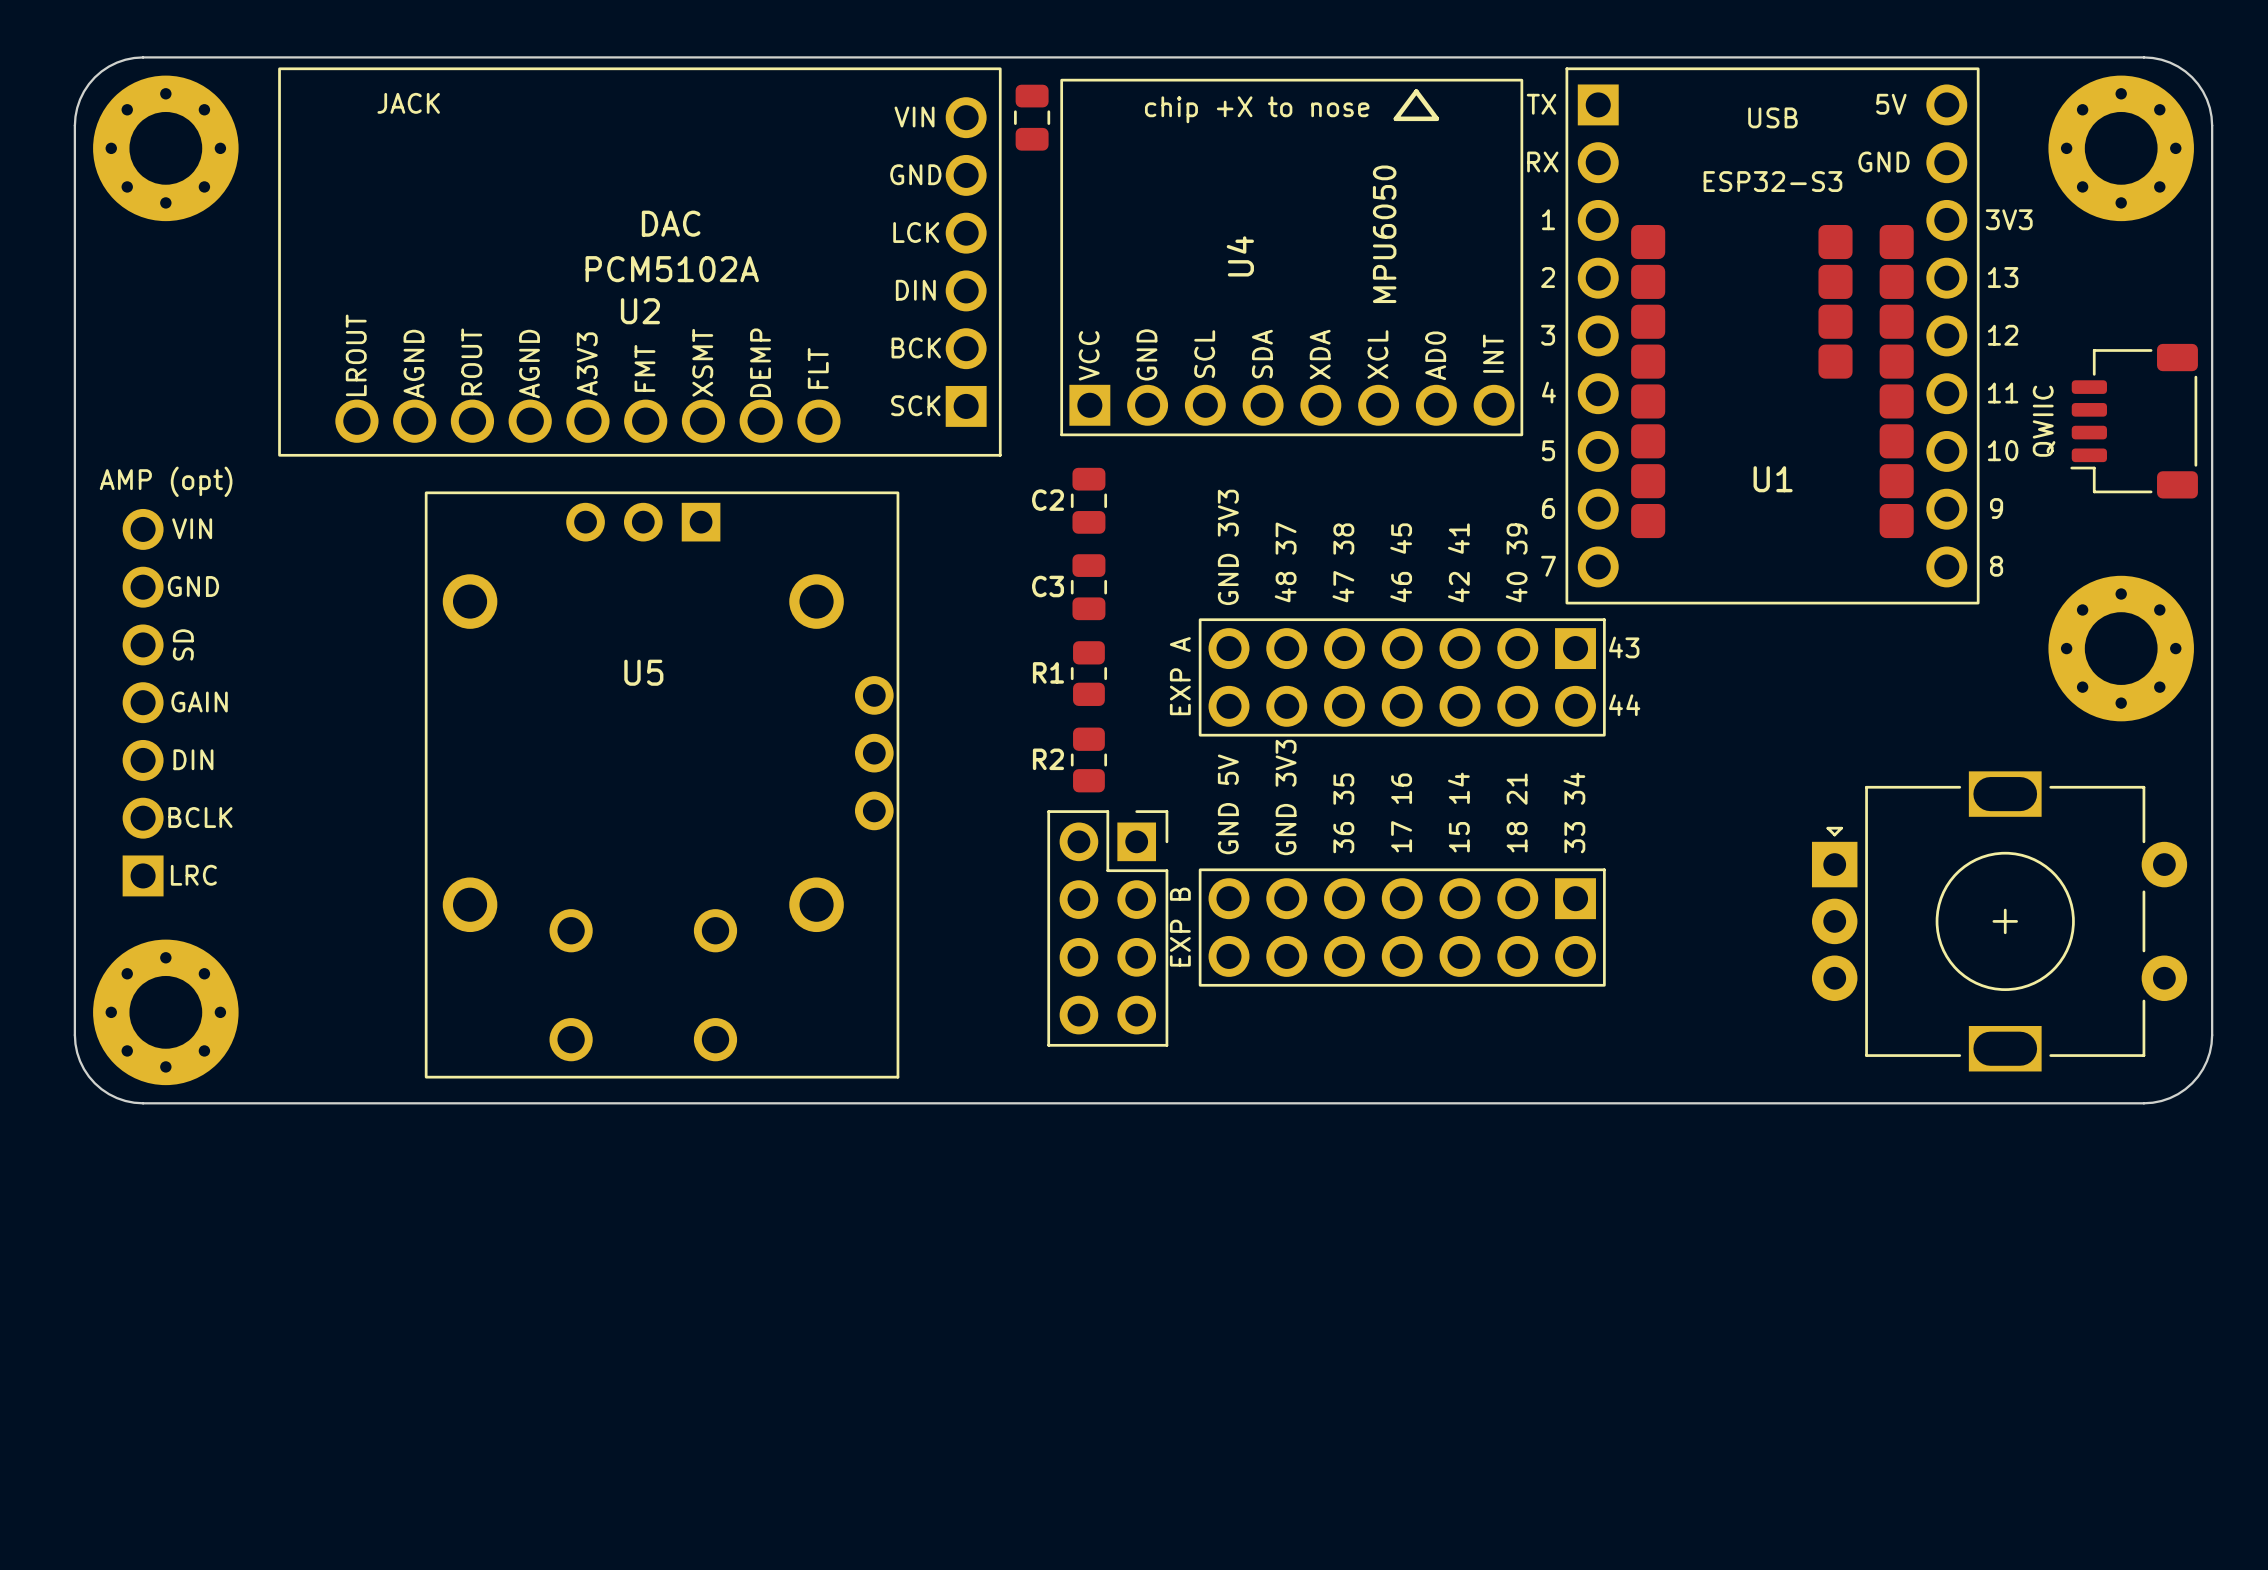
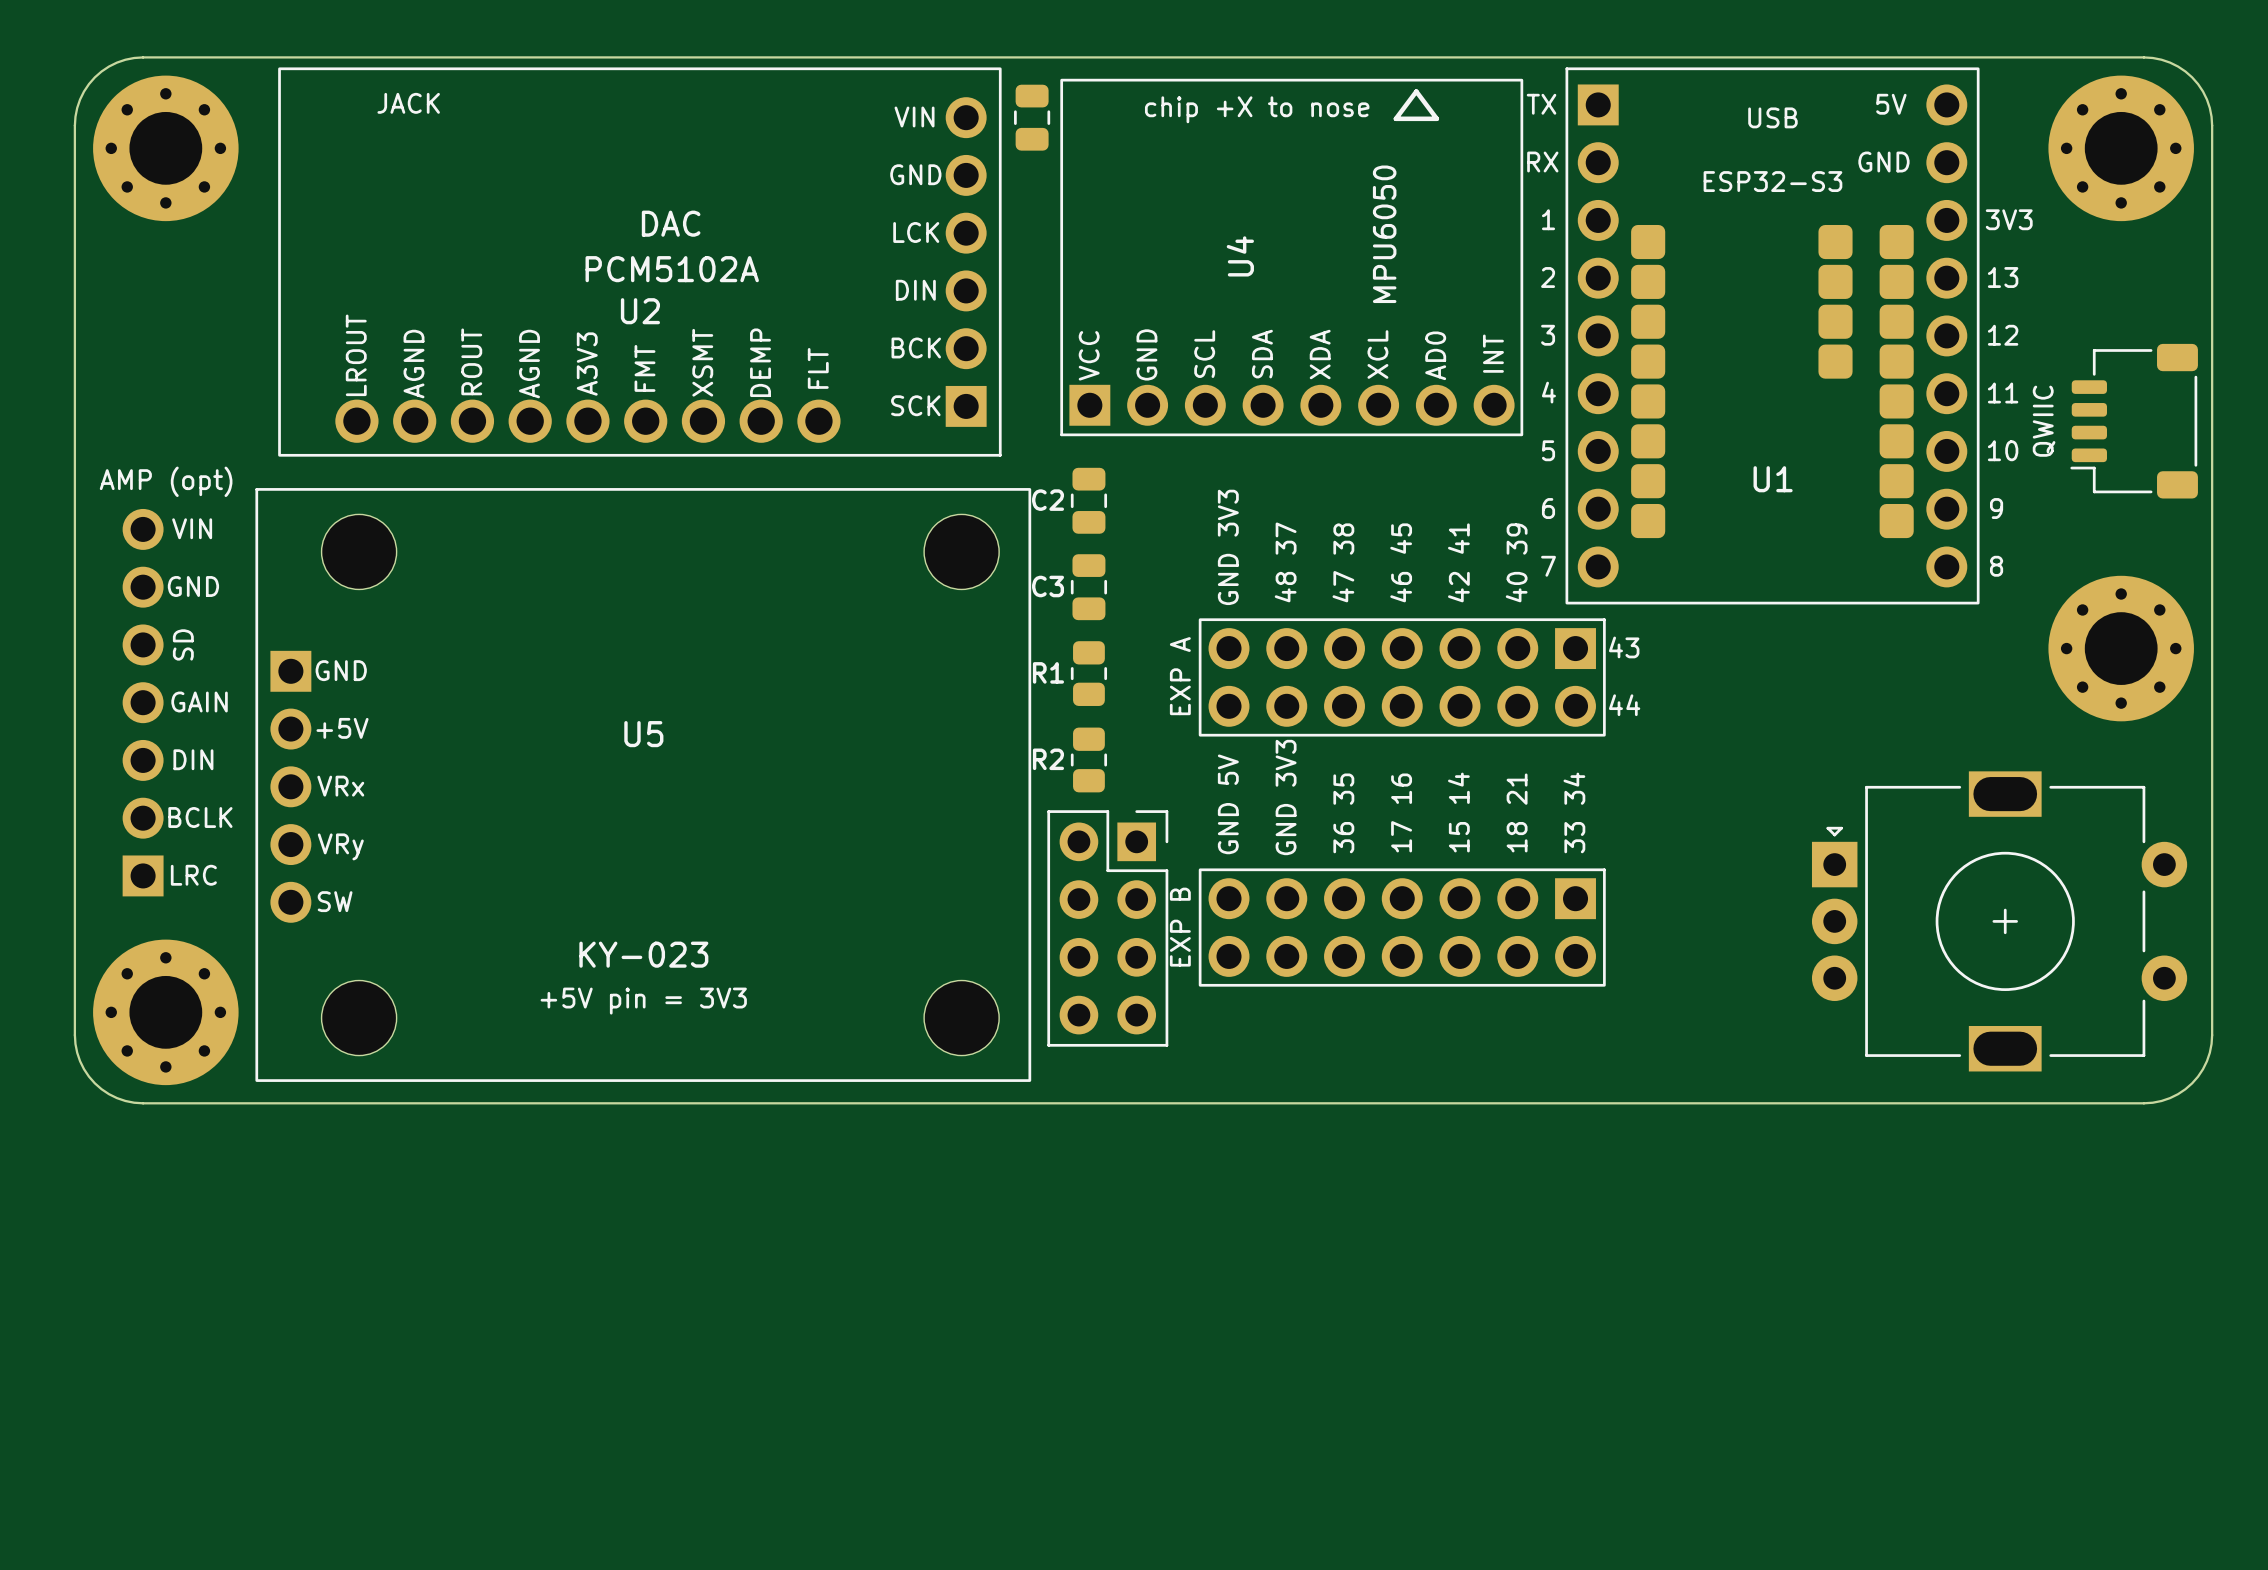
U5 footprint: [424, 491, 900, 1079] -> [255, 488, 1032, 1082]
U5 name position: U5 (643, 672) -> U5 (643, 734)

